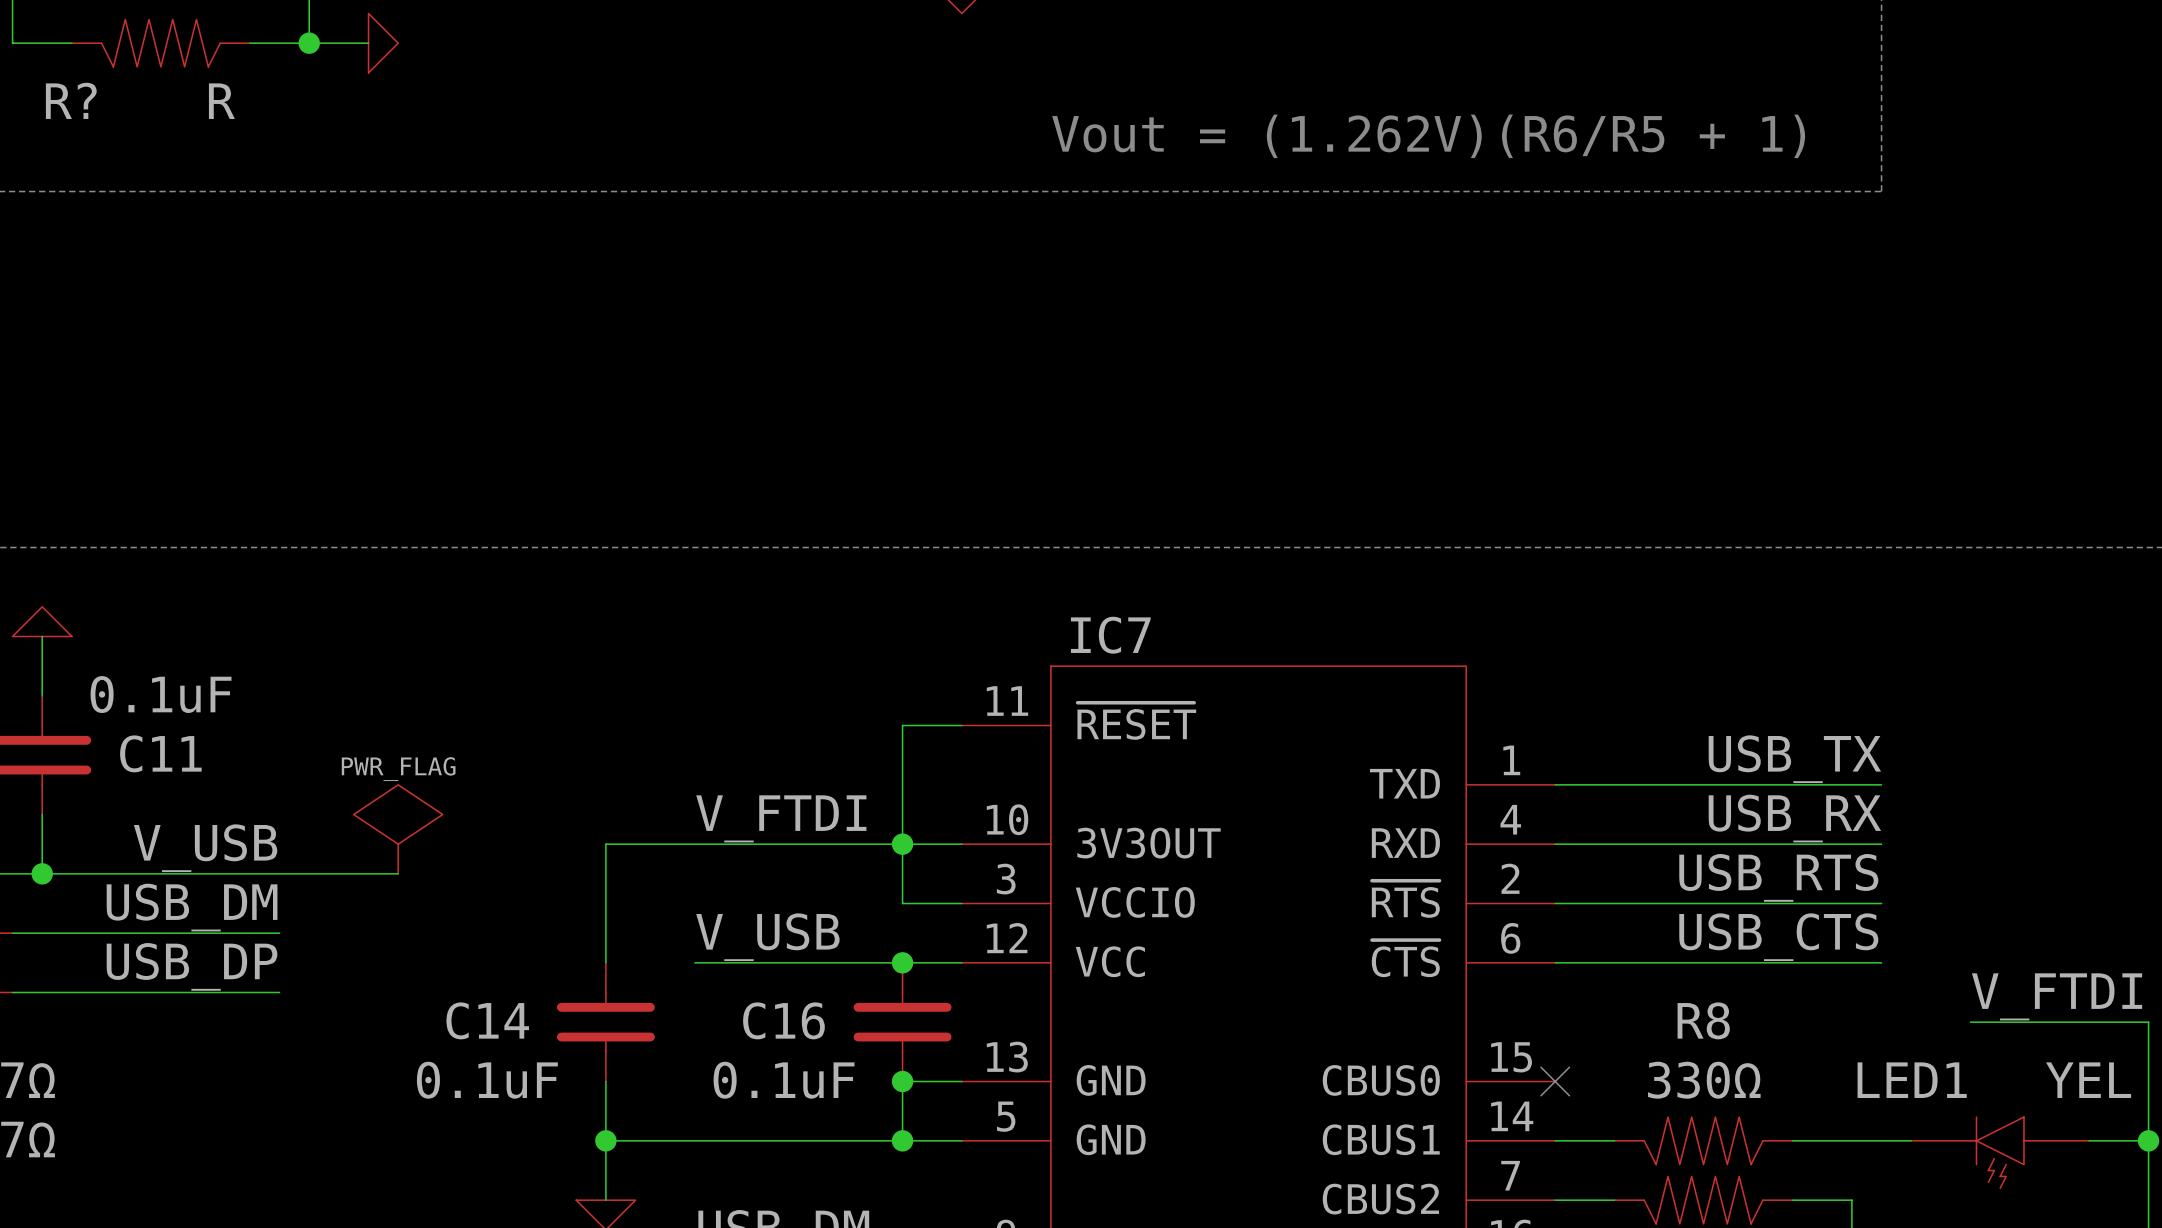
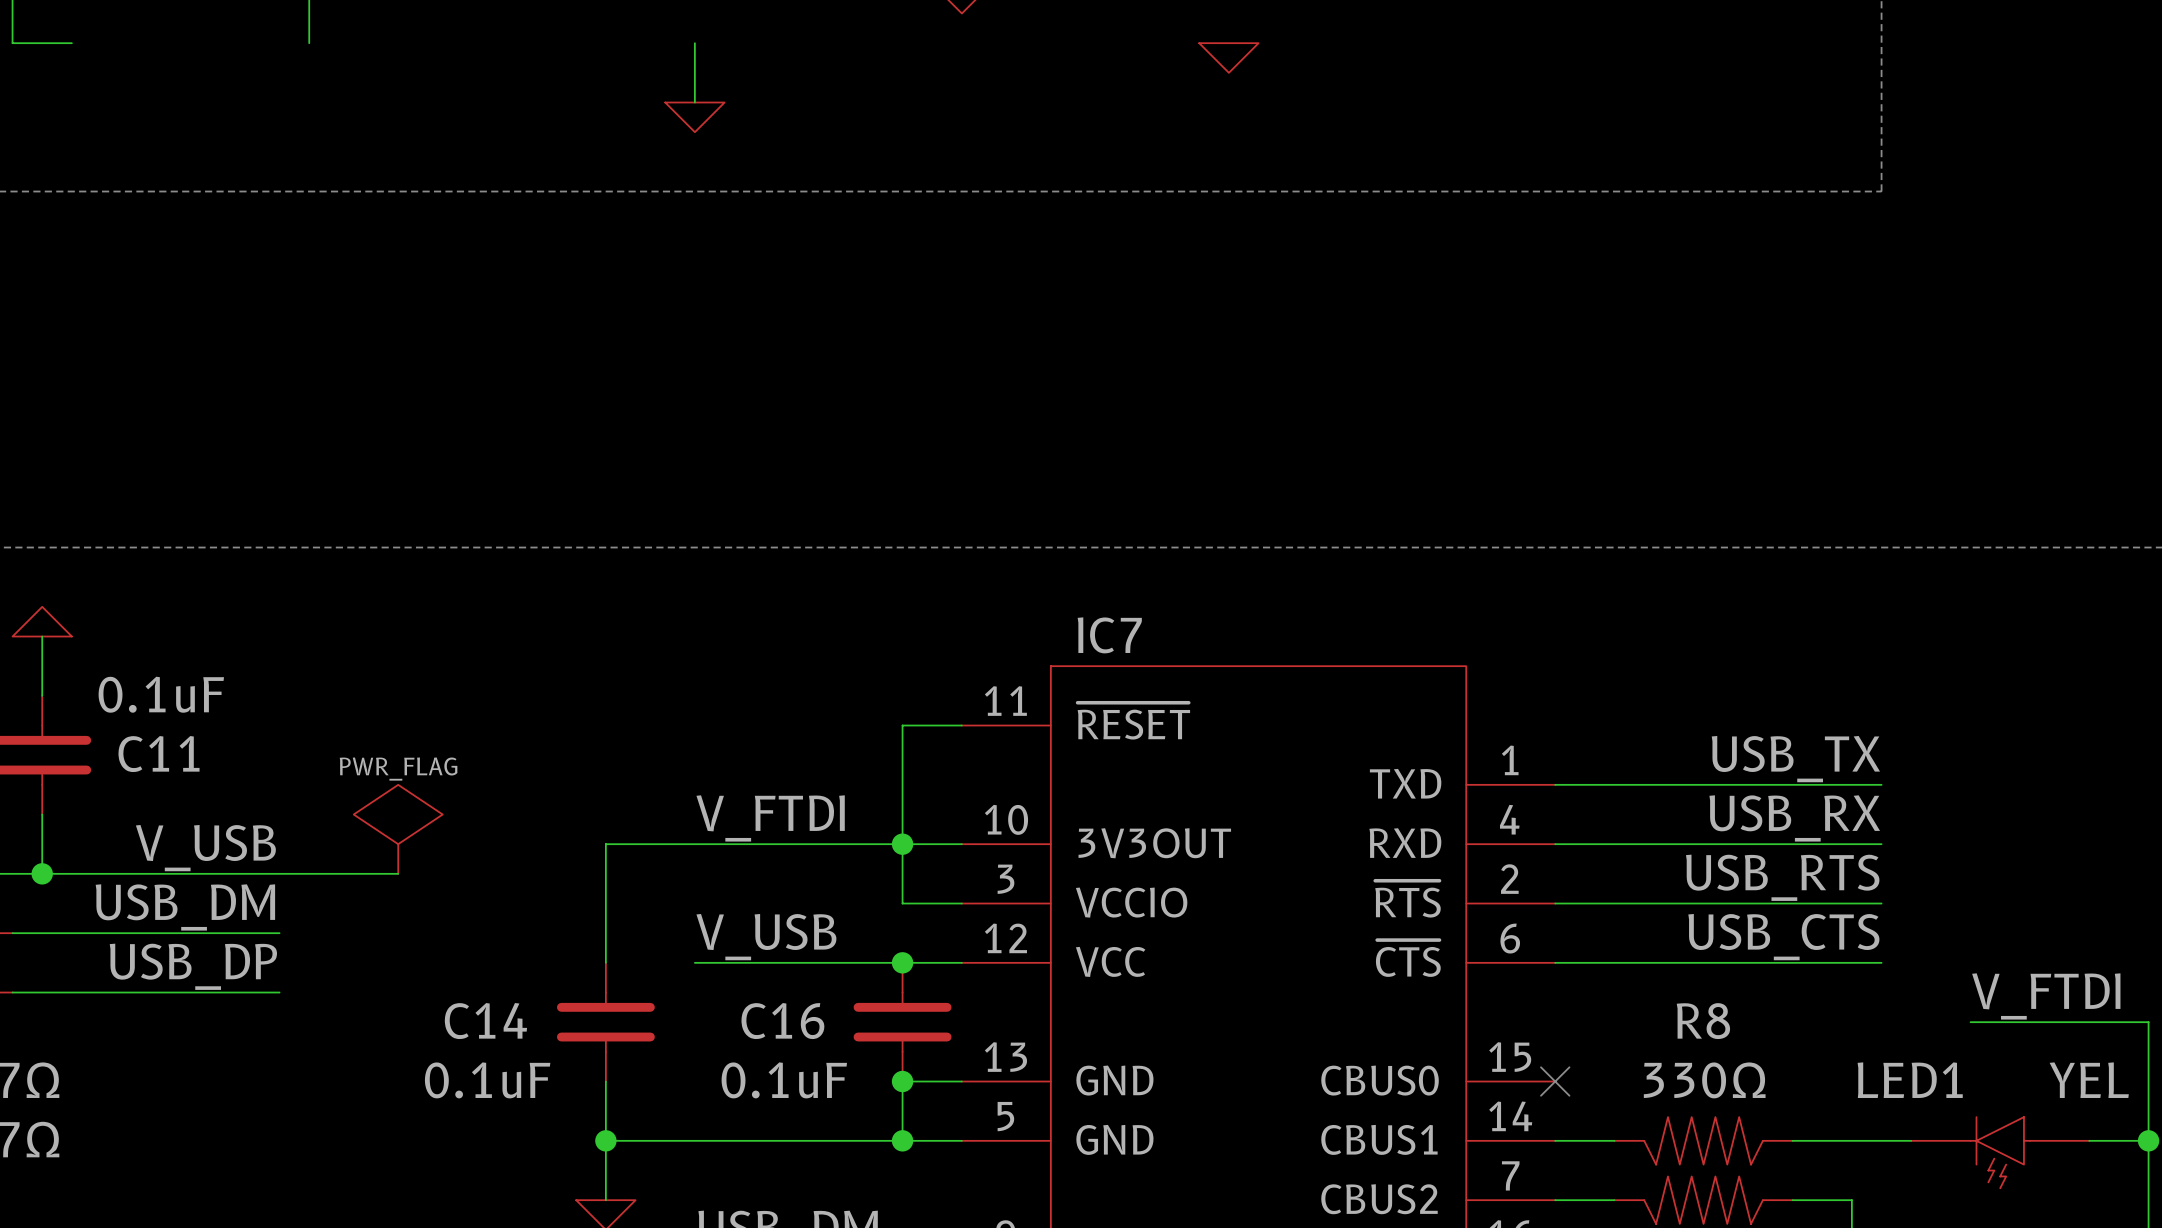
R?: R (160, 43) -> none
wire: (249, 43) (368, 43) -> none
junction: (309, 43) -> none
power symbol: (383, 43) -> none
wire: none -> (694, 43) (694, 102)
power symbol: none -> (1228, 58)
power symbol: none -> (694, 117)
text: Vout = (1.262V)(R6/R5 + 1) (1428, 136) -> none

